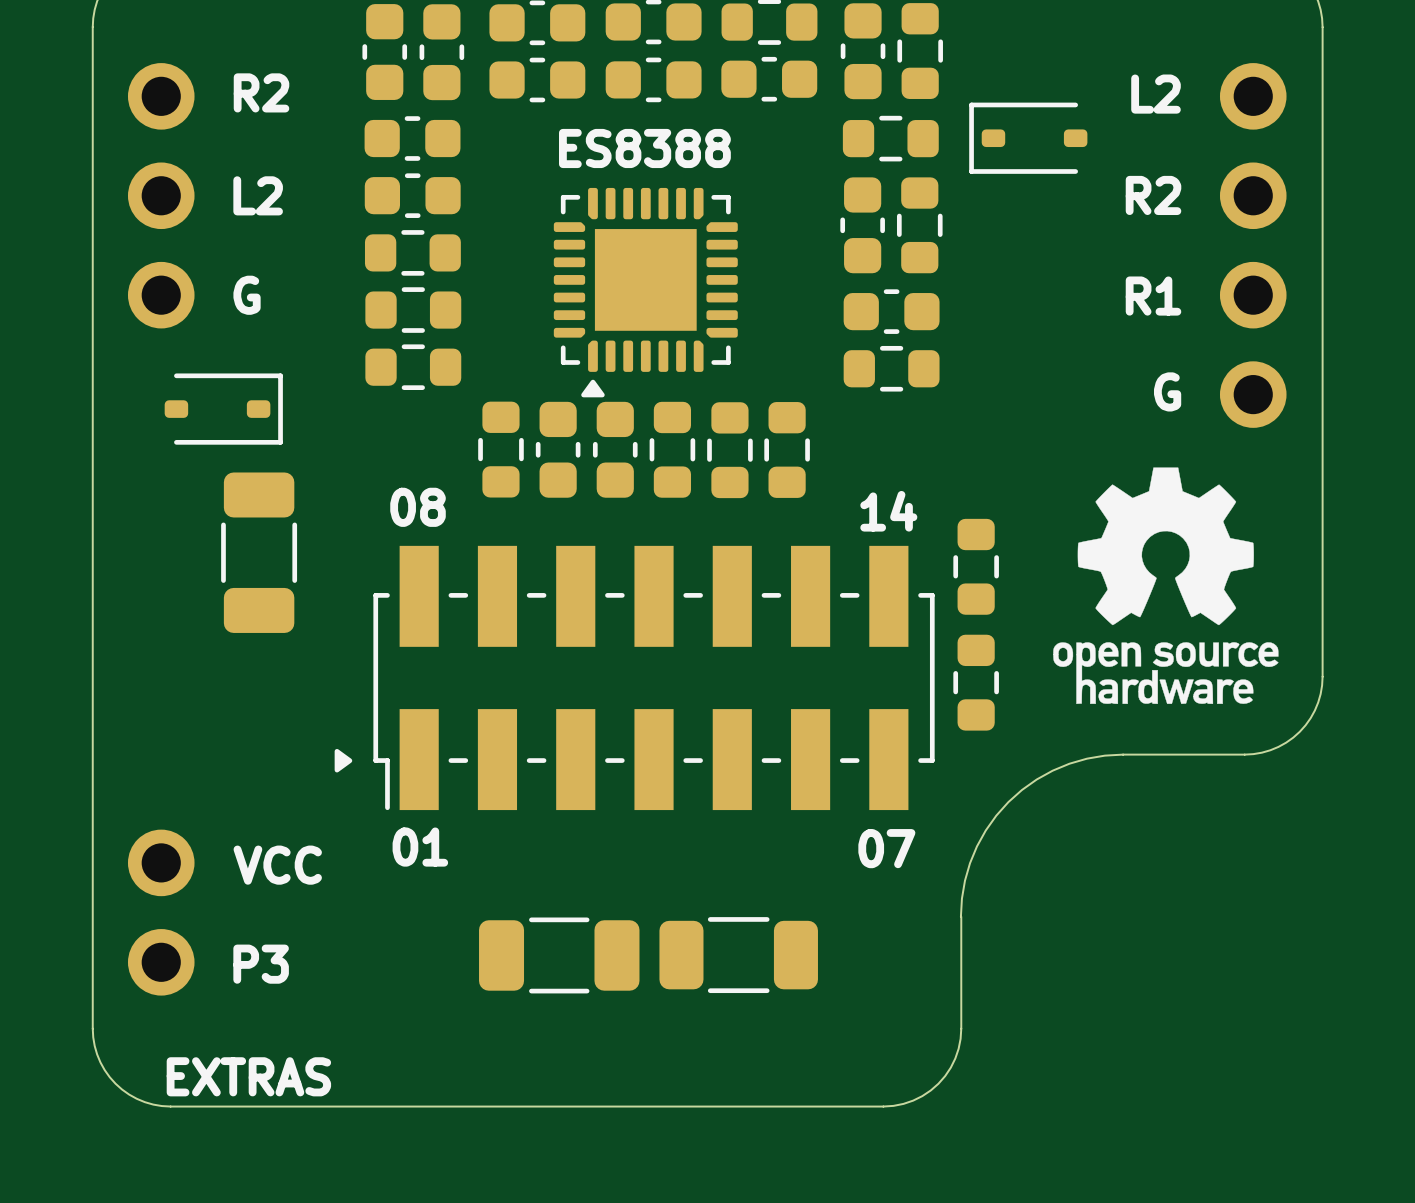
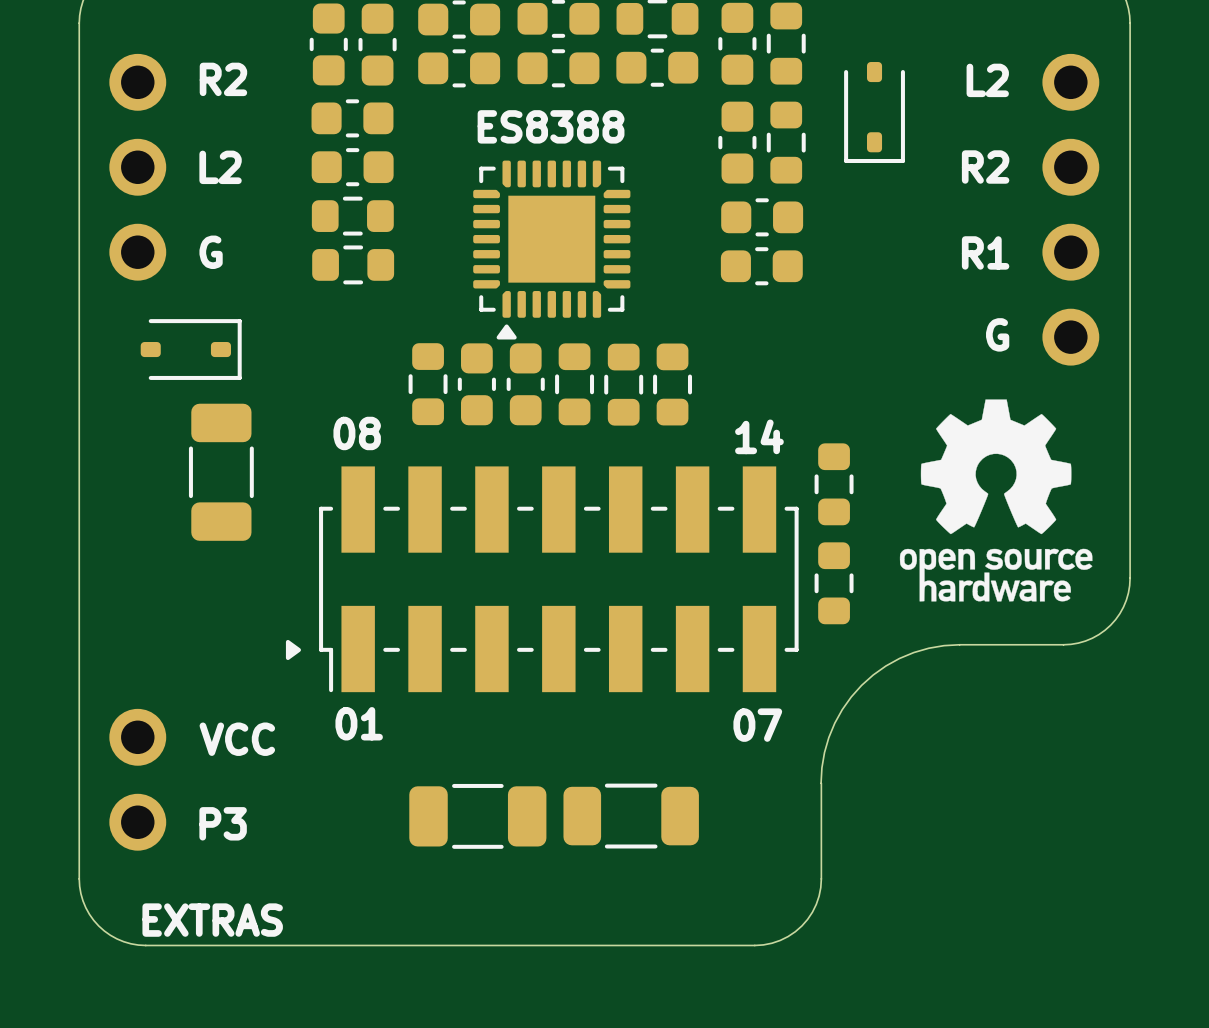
part: (890, 138) -> none
part rotation: 0° (1028, 138) -> 90° counterclockwise (874, 112)
part: none -> (737, 142)
part: none -> (786, 142)
part: (862, 225) -> none
part: (919, 225) -> none
part: none -> (762, 217)
part: (413, 367) -> none
part: (891, 368) -> none

